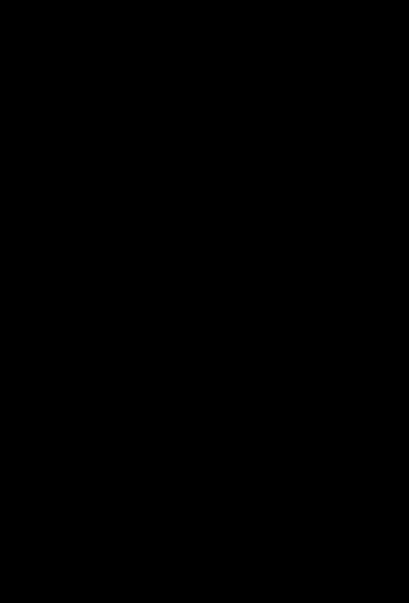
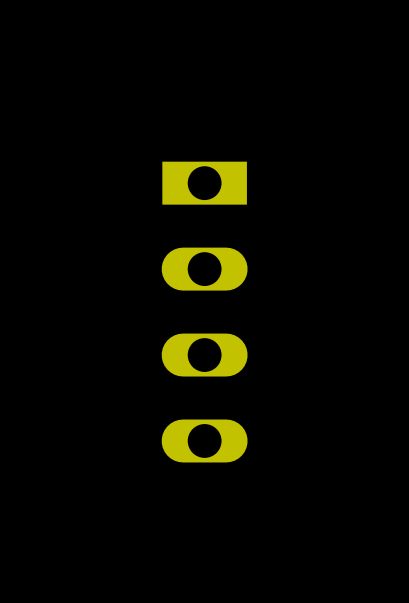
part: none -> (204, 312)

